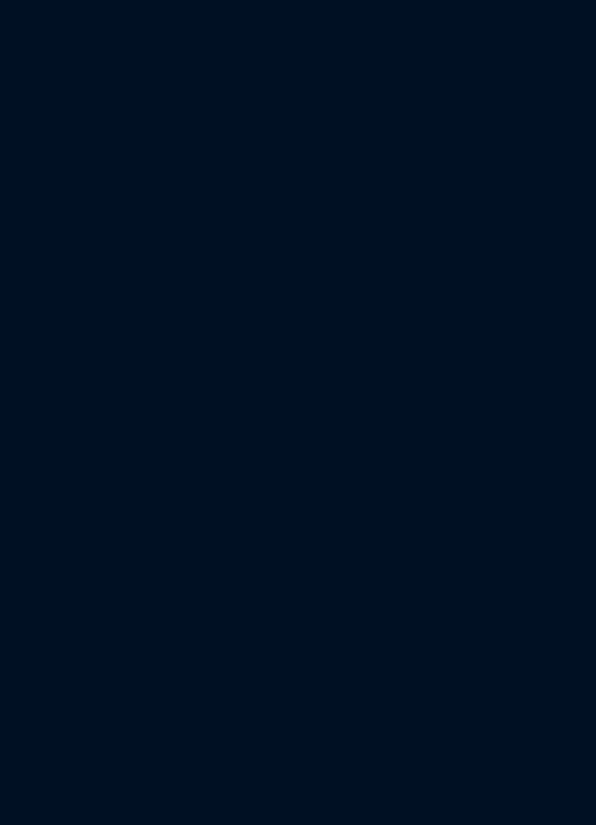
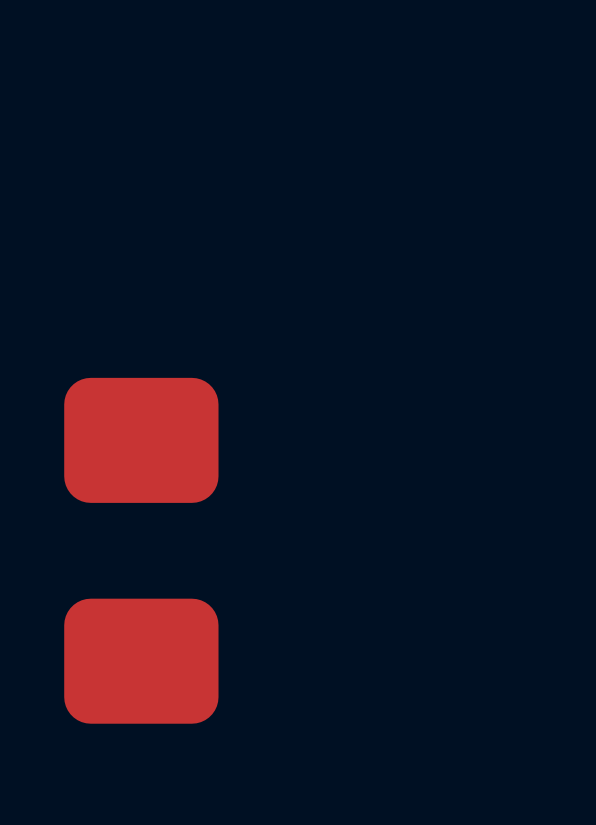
part: none -> (141, 550)

